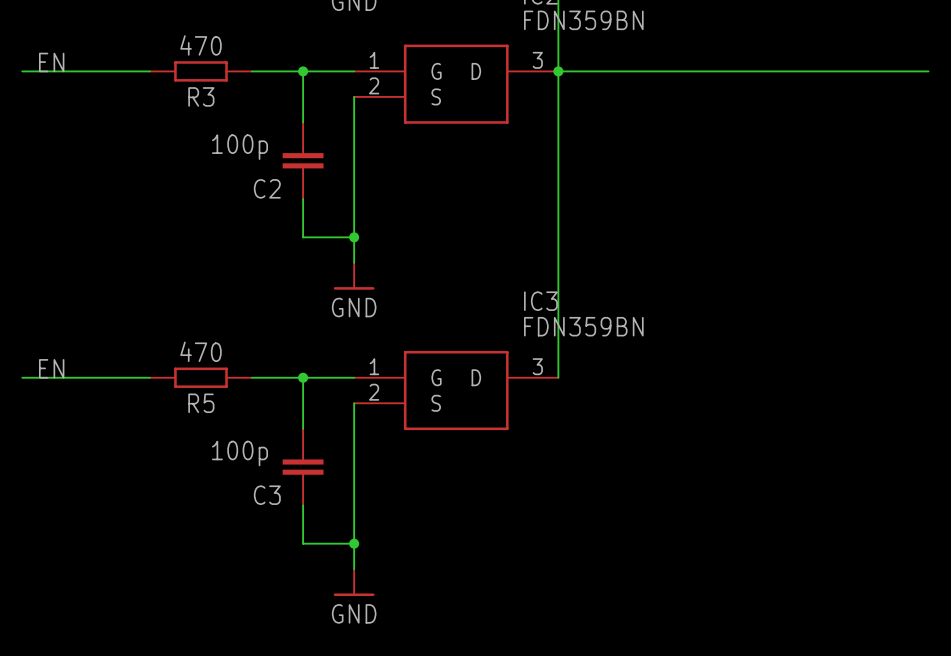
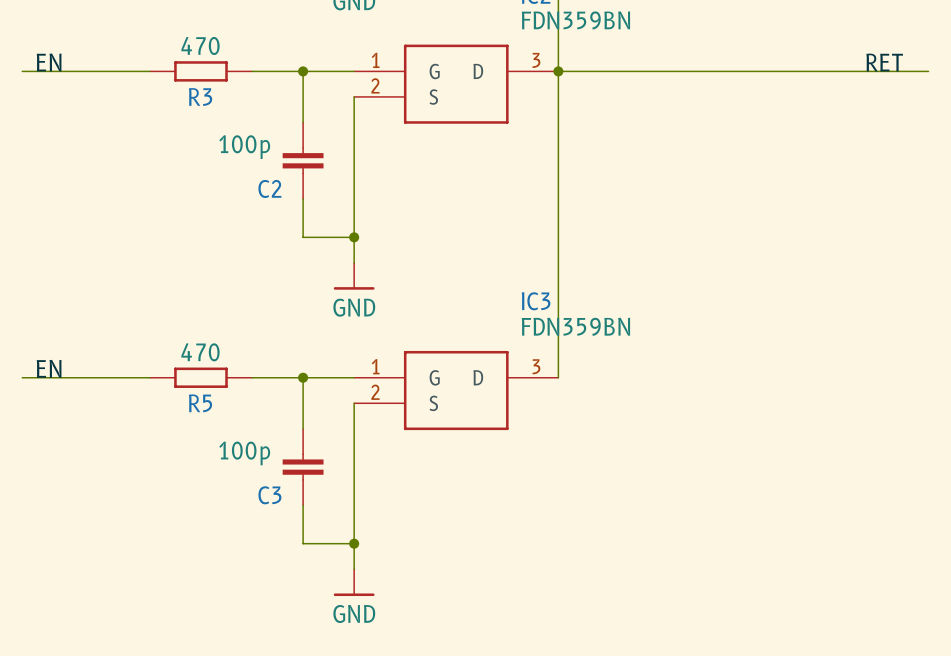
label: none -> RET (884, 62)

